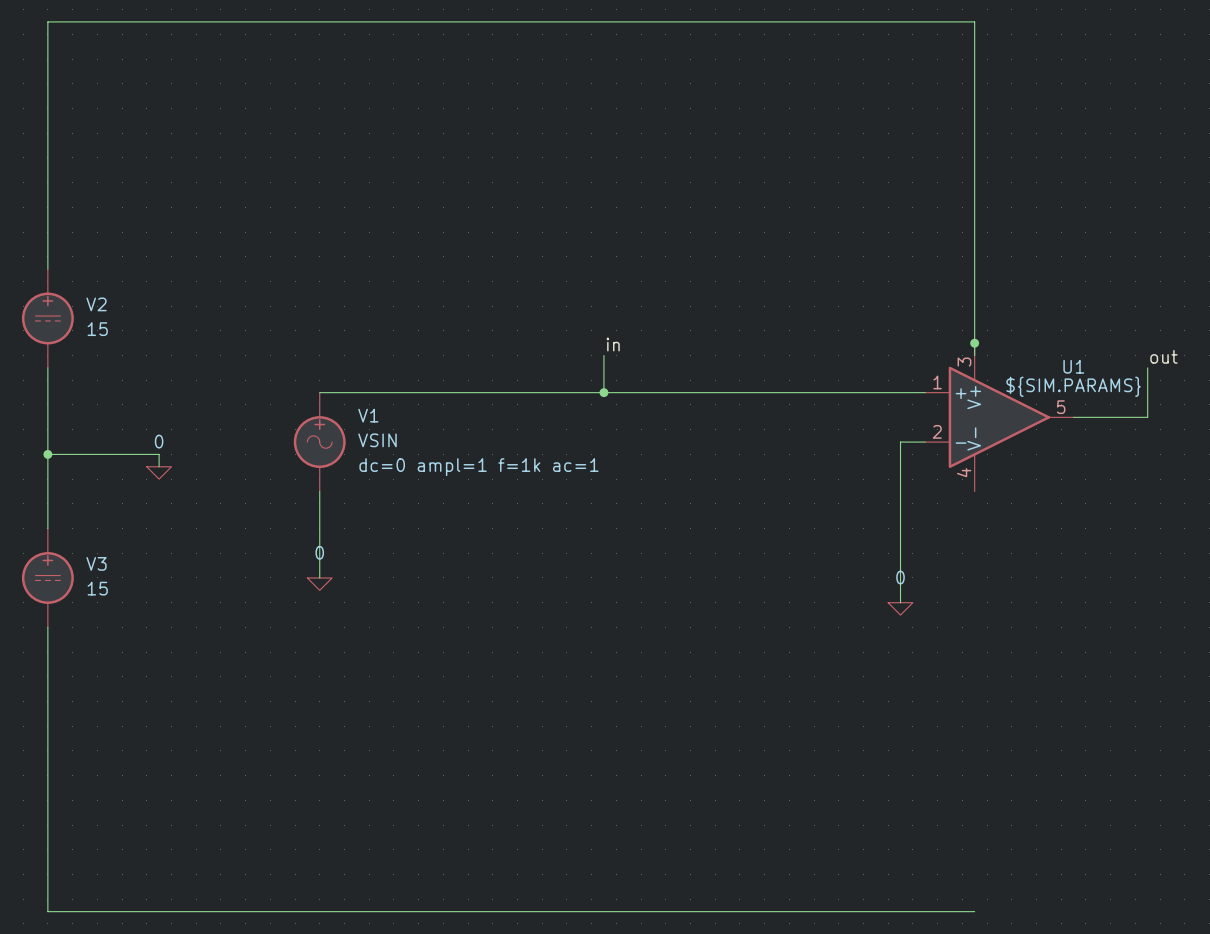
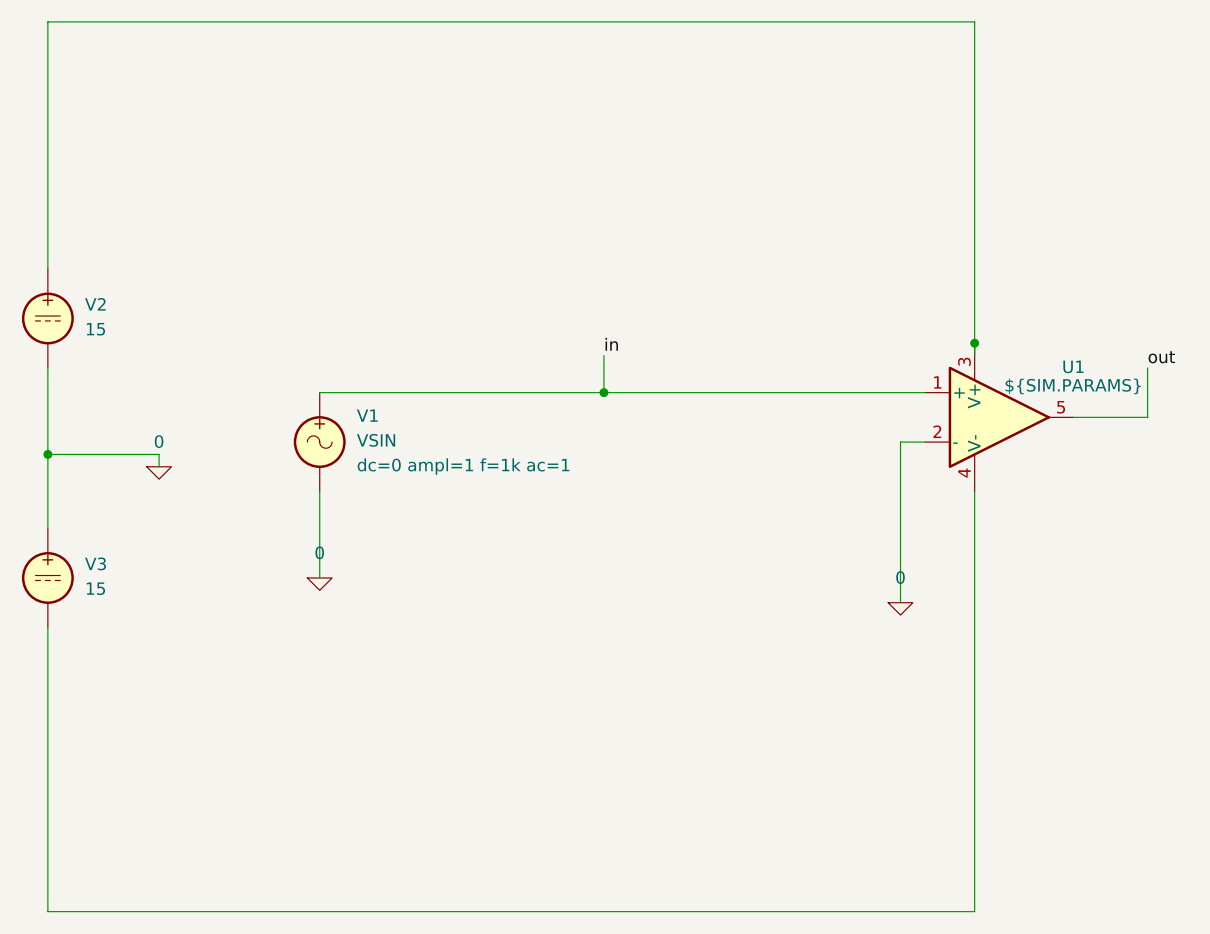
wire: none -> (974, 491) (974, 911)

